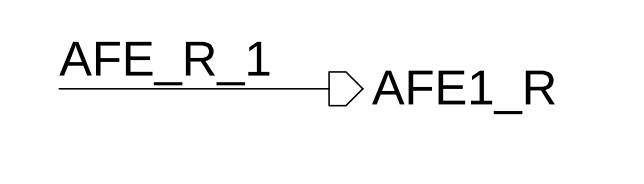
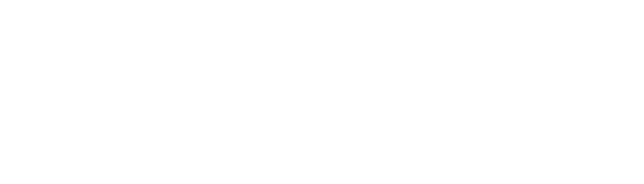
label: AFE_R_1 (164, 63) -> none
wire: (59, 88) (329, 88) -> none
hierarchical label: AFE1_R (463, 92) -> none

